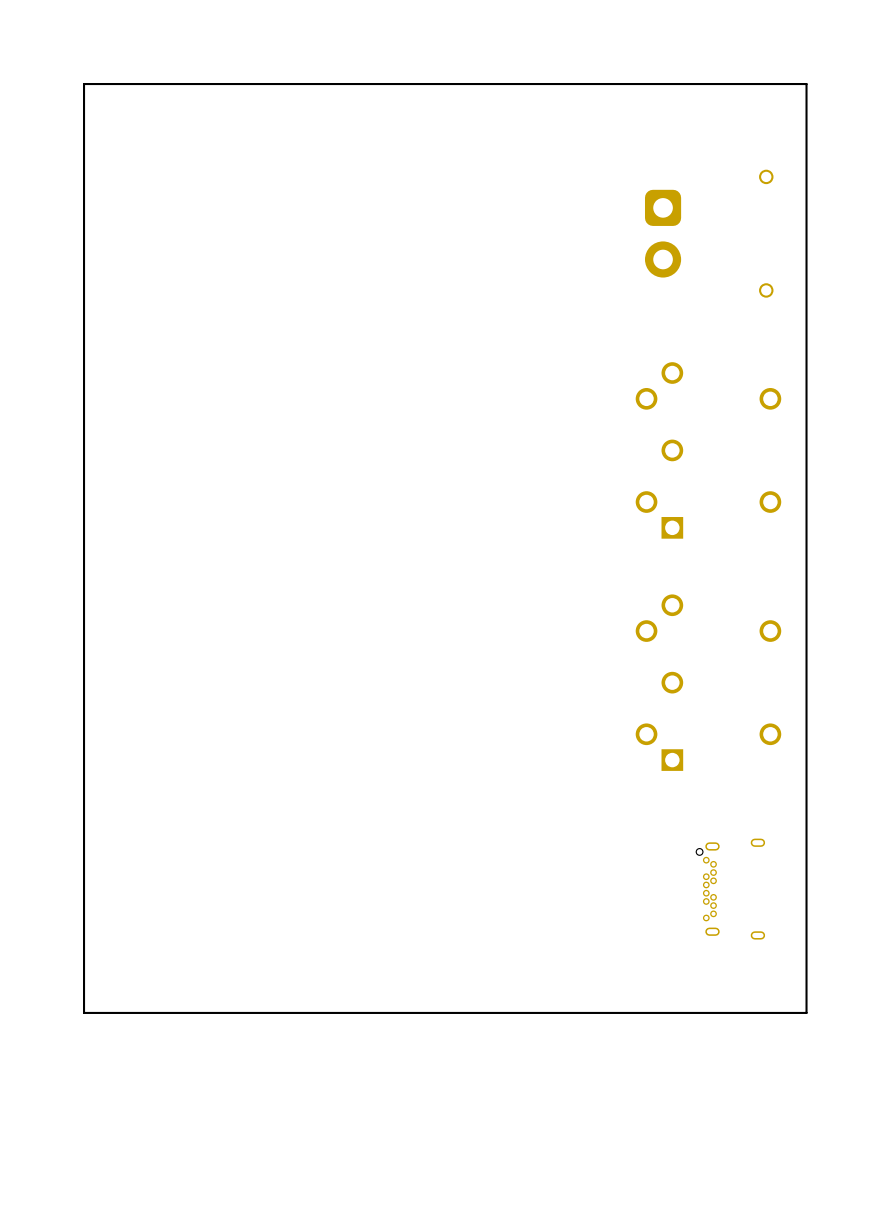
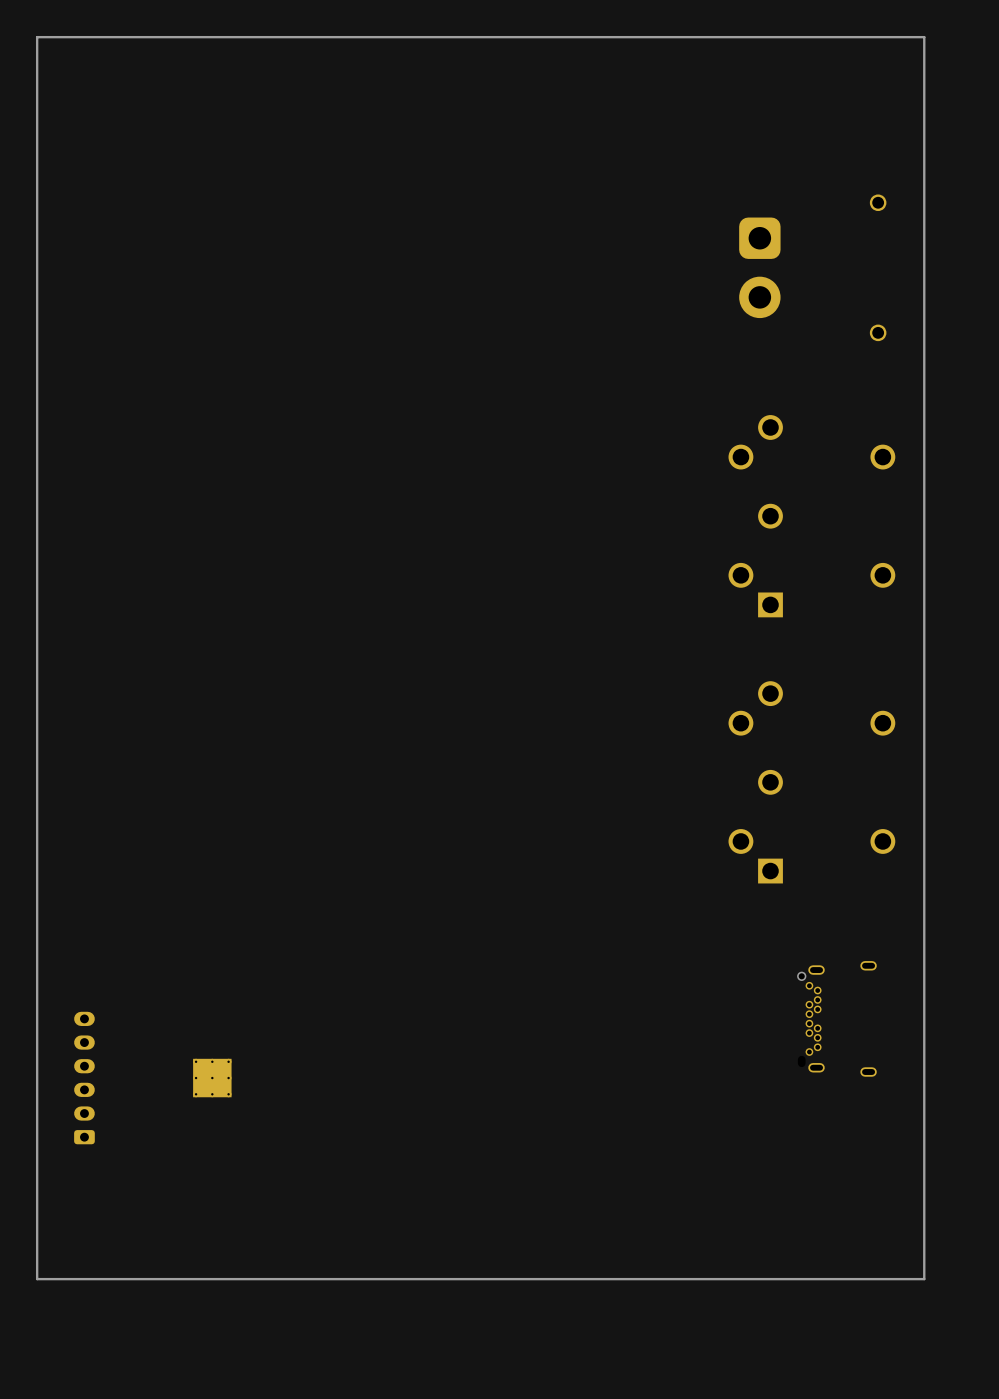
board edge: (806, 84) (84, 84) (84, 1012) (806, 1012) -> (924, 96) (924, 37) (37, 37) (37, 1279) (924, 1279) (924, 1160)
part: none -> (84, 1078)
part: none -> (212, 1078)

